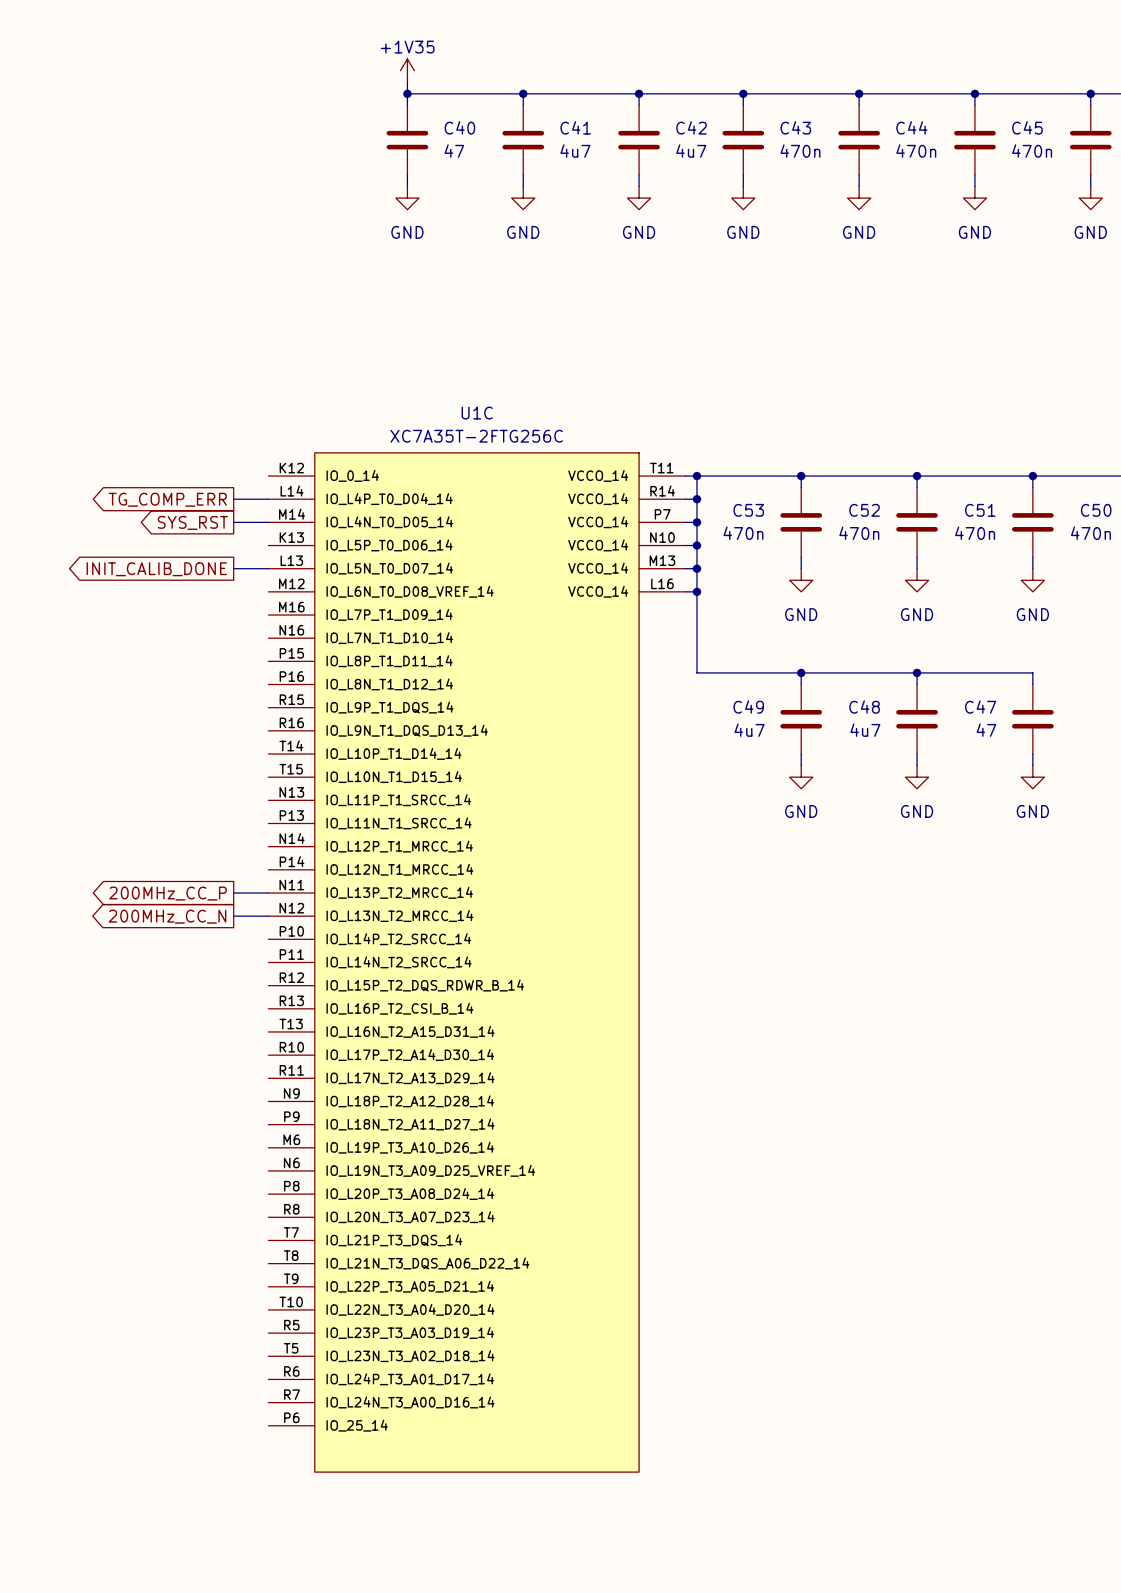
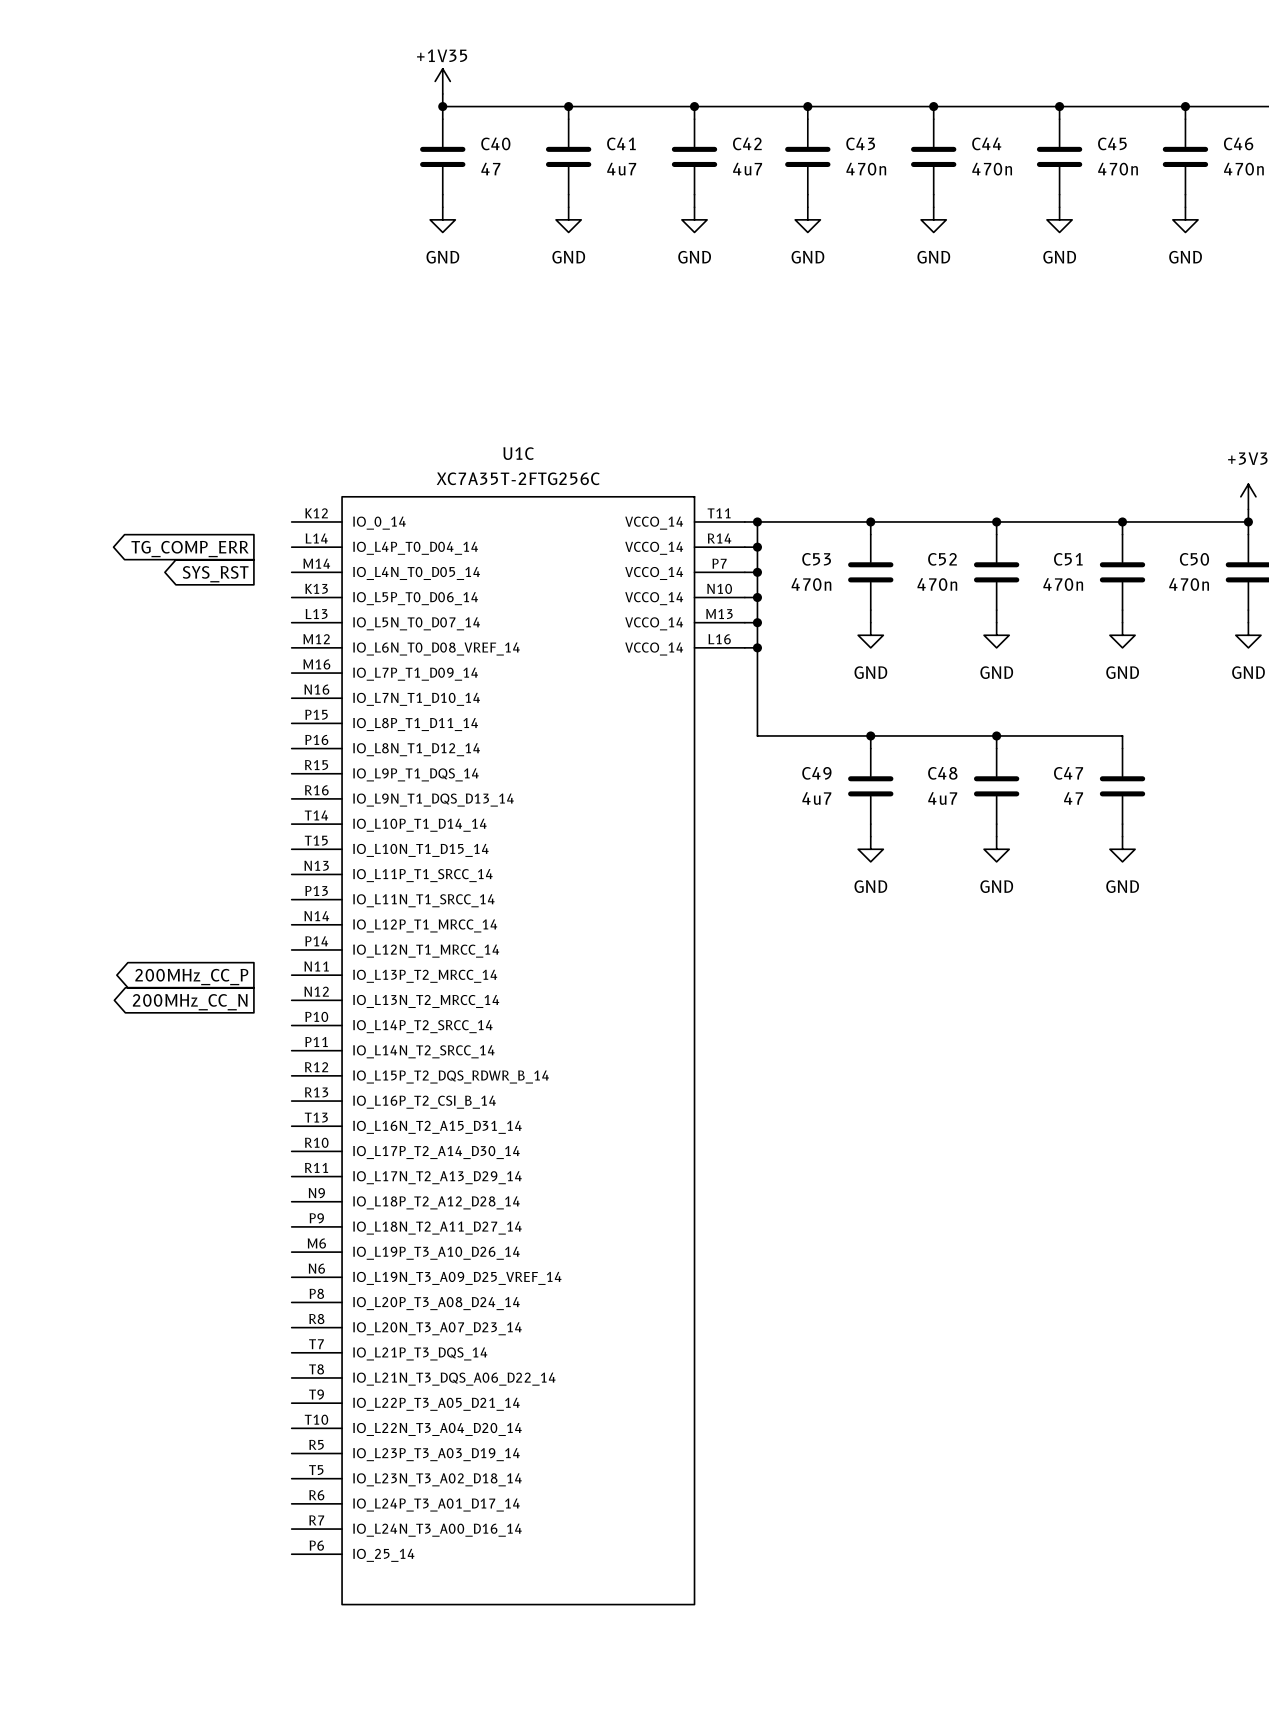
wire: (233, 499) (268, 499) -> none
wire: (233, 522) (268, 522) -> none
wire: (233, 568) (268, 568) -> none
global label: INIT_CALIB_DONE (156, 569) -> none
wire: (233, 893) (268, 893) -> none
wire: (233, 916) (268, 916) -> none

